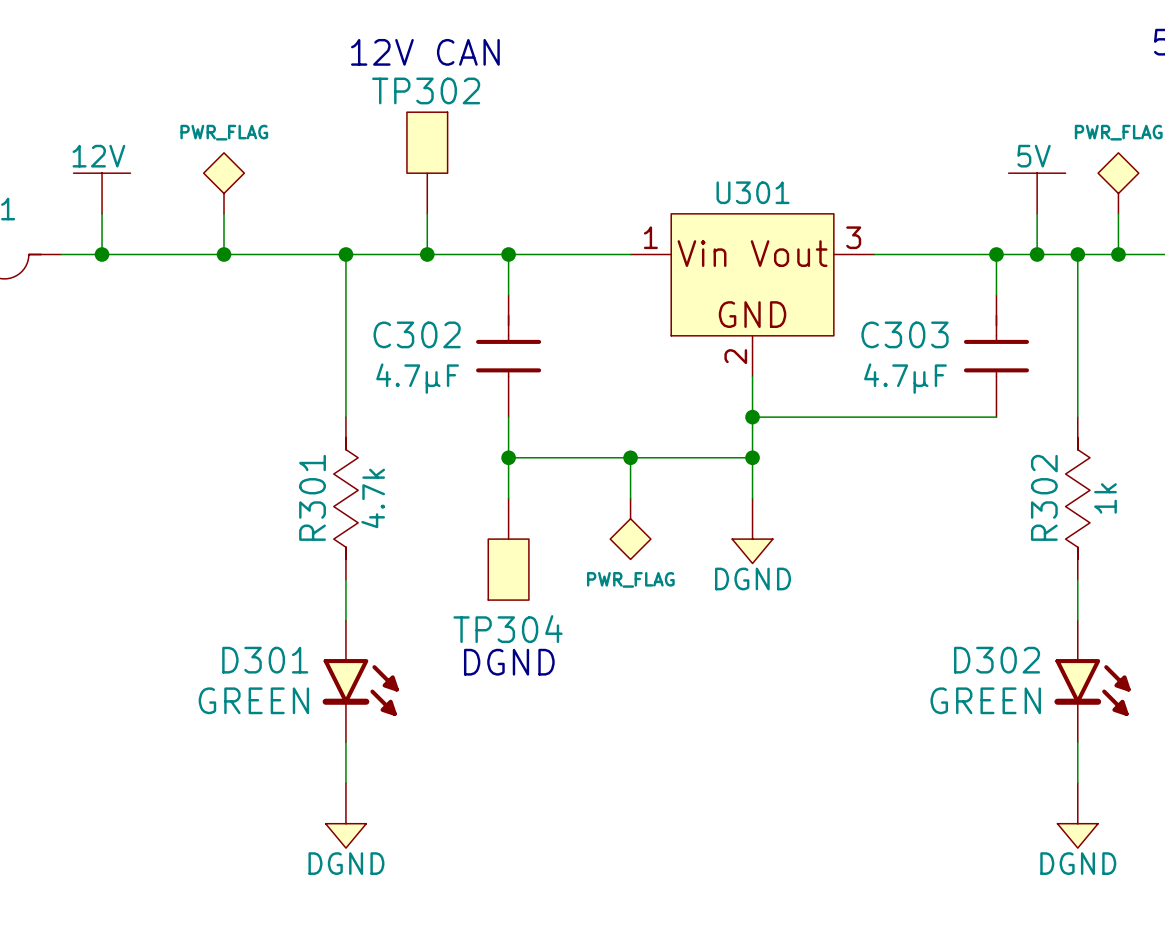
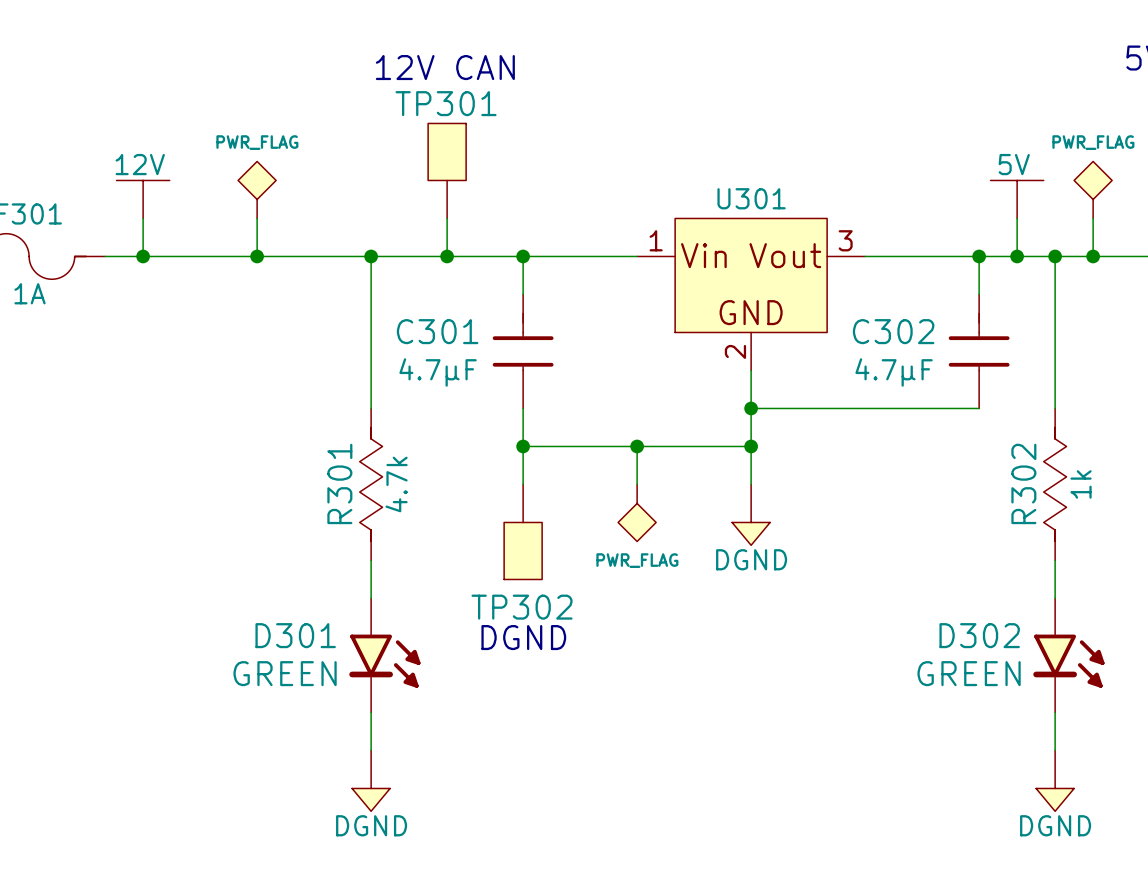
TP302 name: TP302 (426, 90) -> TP301 (446, 103)
C302 name: C302 (417, 334) -> C301 (437, 331)
C303 name: C303 (904, 334) -> C302 (893, 331)
TP304 name: TP304 (508, 629) -> TP302 (522, 607)

